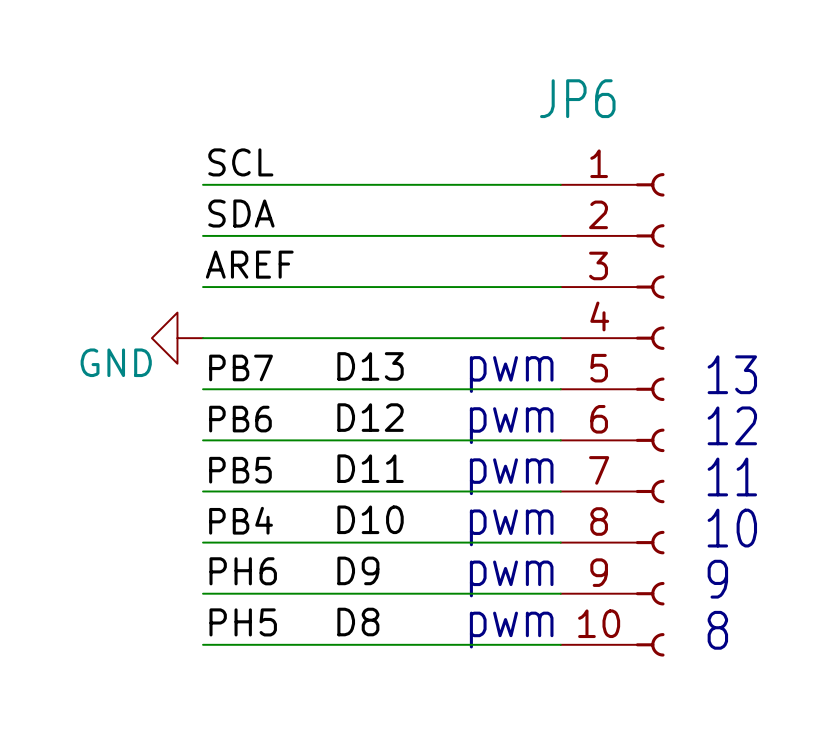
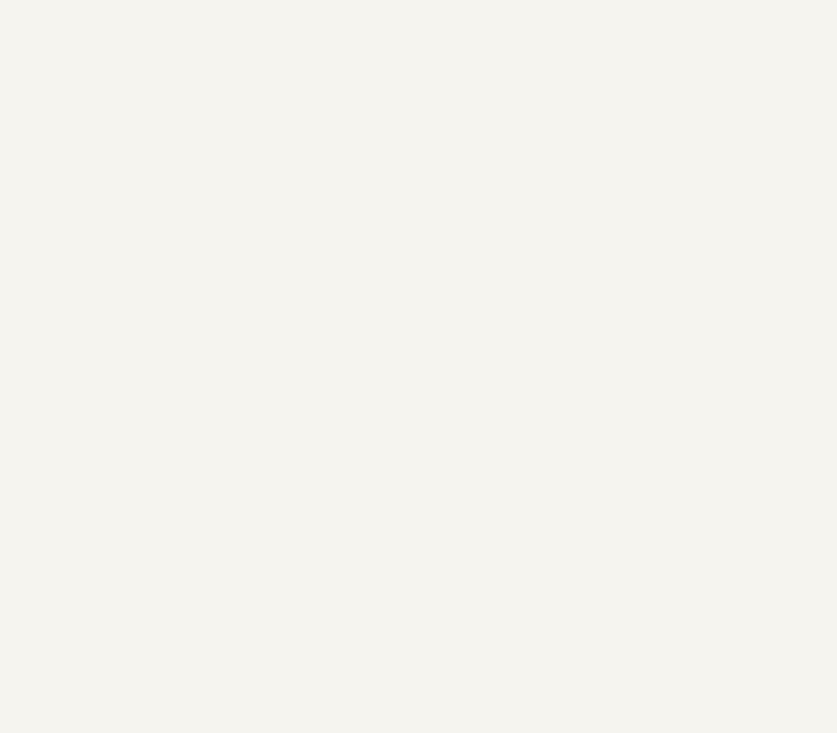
label: SCL (240, 162) -> none
wire: (203, 184) (560, 184) -> none
label: SDA (241, 213) -> none
wire: (203, 235) (560, 235) -> none
label: AREF (249, 264) -> none
wire: (203, 287) (560, 287) -> none
power symbol: GND (177, 338) -> none
wire: (203, 338) (560, 338) -> none
label: D13 (370, 366) -> none
label: PB7 (241, 367) -> none
text: pwm (511, 374) -> none
text: 13 (732, 374) -> none
wire: (203, 389) (560, 389) -> none
JP6: (612, 414) -> none
label: D12 (370, 417) -> none
label: PB6 (240, 419) -> none
text: pwm (511, 425) -> none
text: 12 (732, 425) -> none
wire: (203, 440) (560, 440) -> none
label: D11 (370, 468) -> none
label: PB5 (240, 470) -> none
text: pwm (511, 476) -> none
text: 11 (732, 476) -> none
wire: (203, 491) (560, 491) -> none
label: D10 (370, 519) -> none
label: PB4 (241, 520) -> none
text: pwm (511, 527) -> none
text: 10 (732, 528) -> none
wire: (203, 542) (560, 542) -> none
label: D9 (358, 570) -> none
label: PH6 (243, 571) -> none
text: pwm (511, 578) -> none
text: 9 (717, 579) -> none
wire: (203, 593) (560, 593) -> none
label: PH5 (243, 622) -> none
label: D8 (358, 622) -> none
text: pwm (511, 630) -> none
text: 8 (717, 630) -> none
wire: (203, 644) (560, 644) -> none

